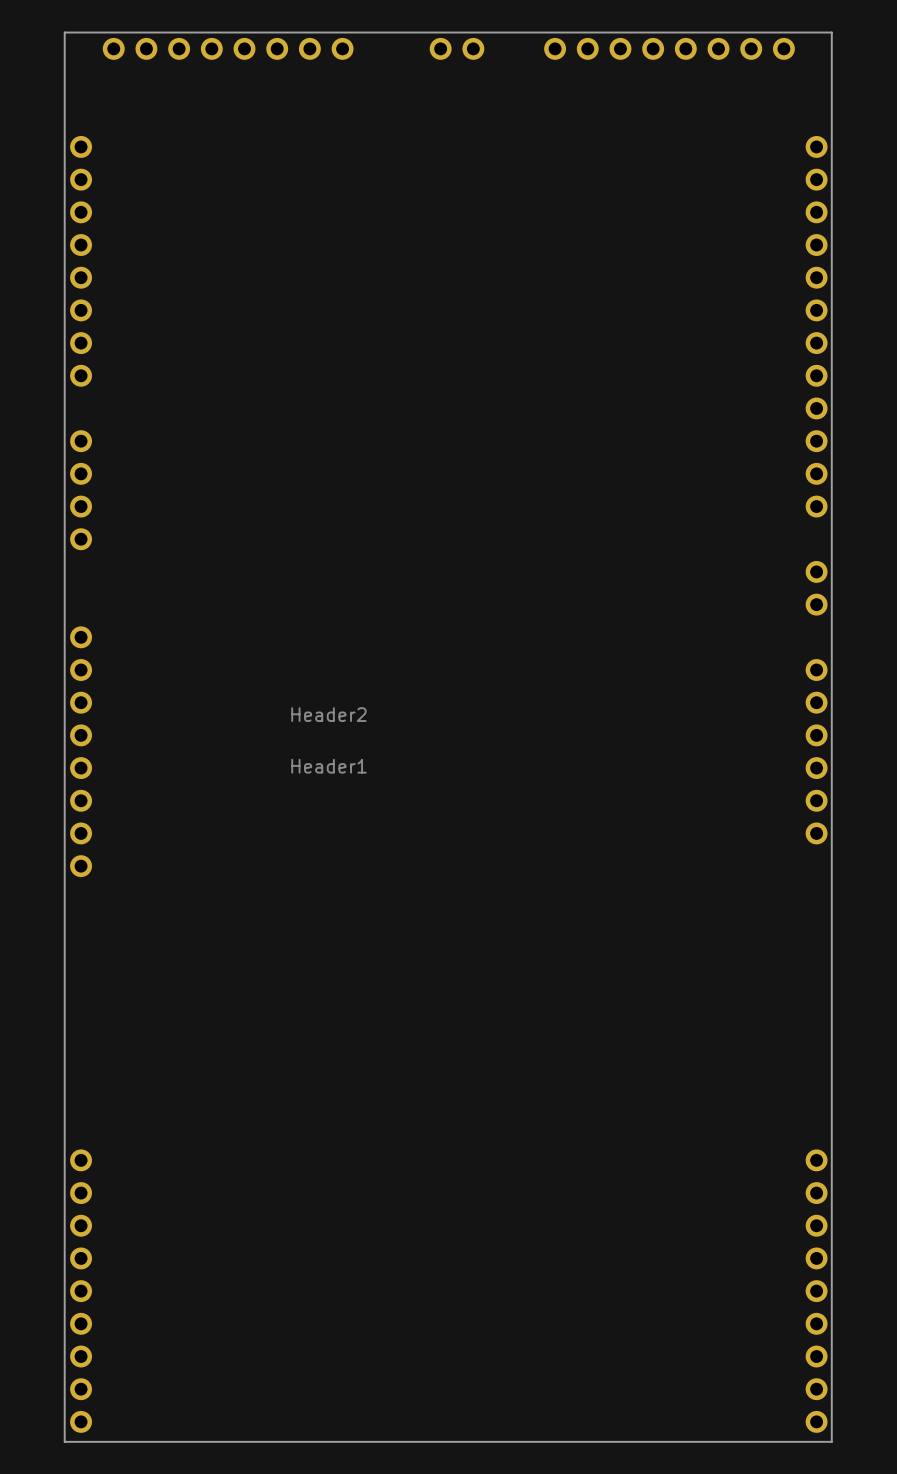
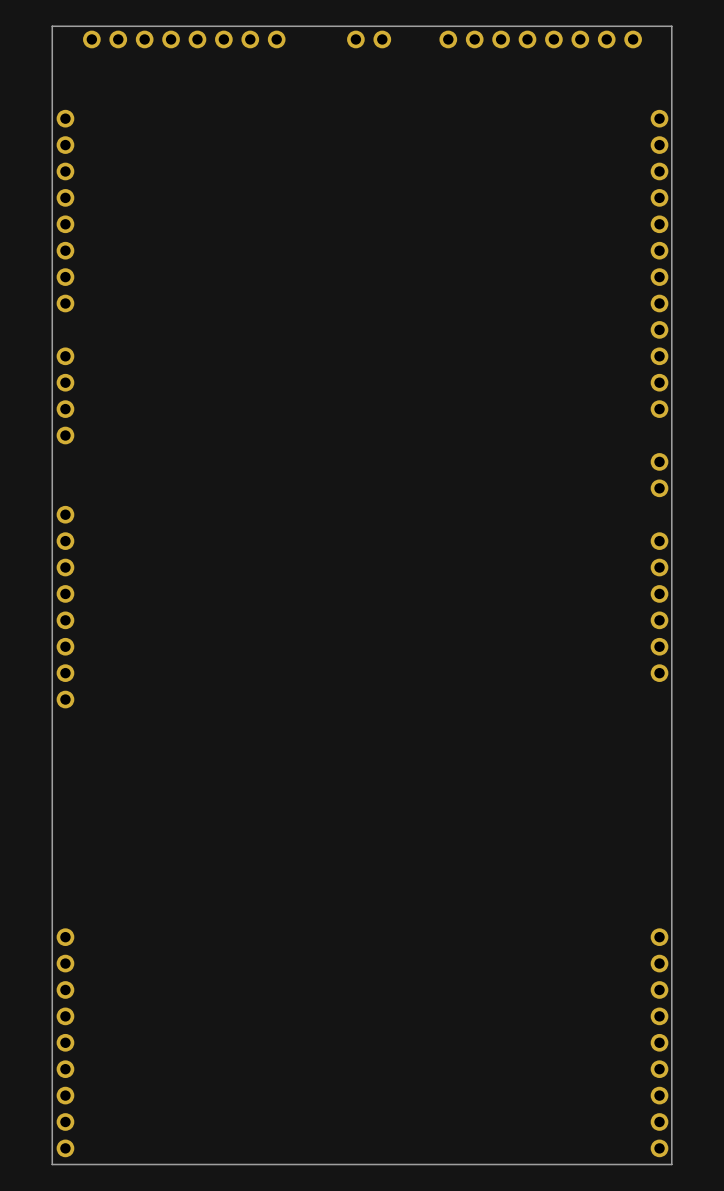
drawing: [291, 707, 367, 723] -> none
drawing: [291, 758, 367, 774] -> none

